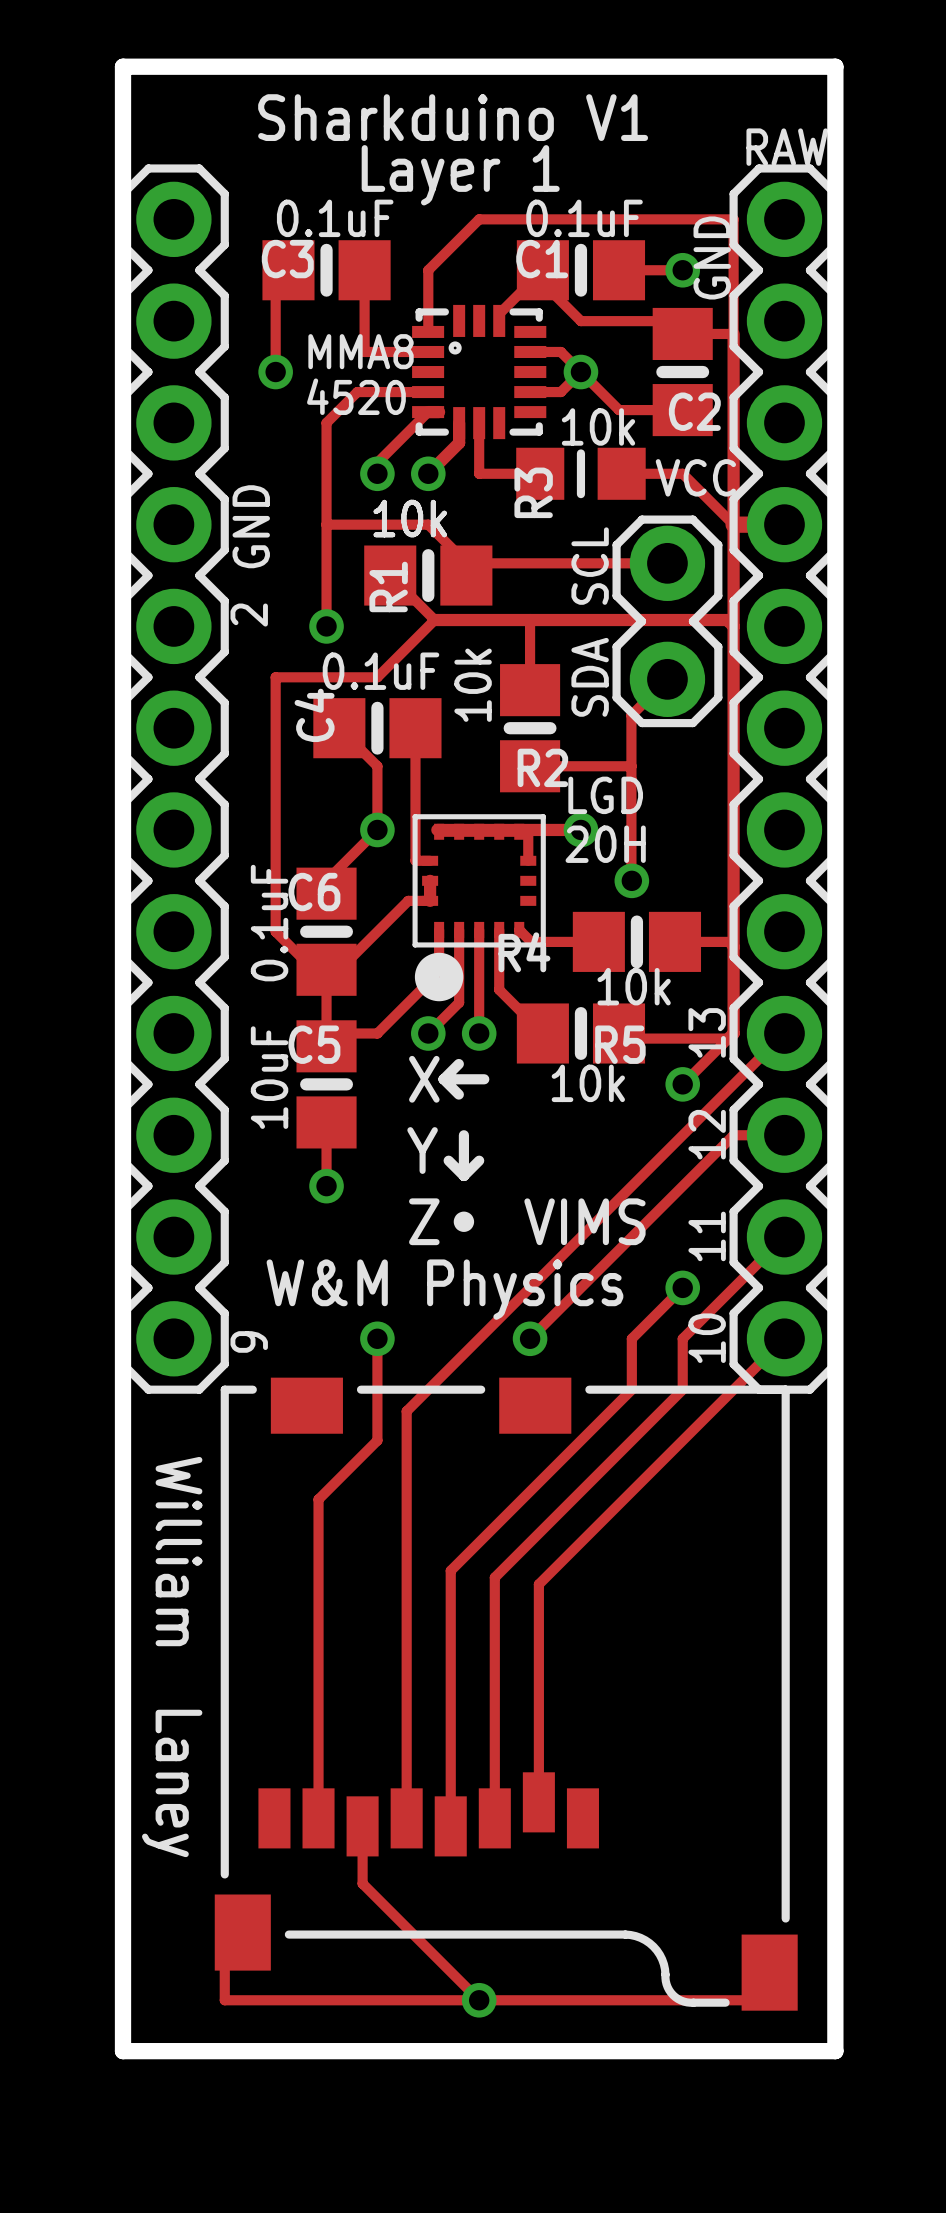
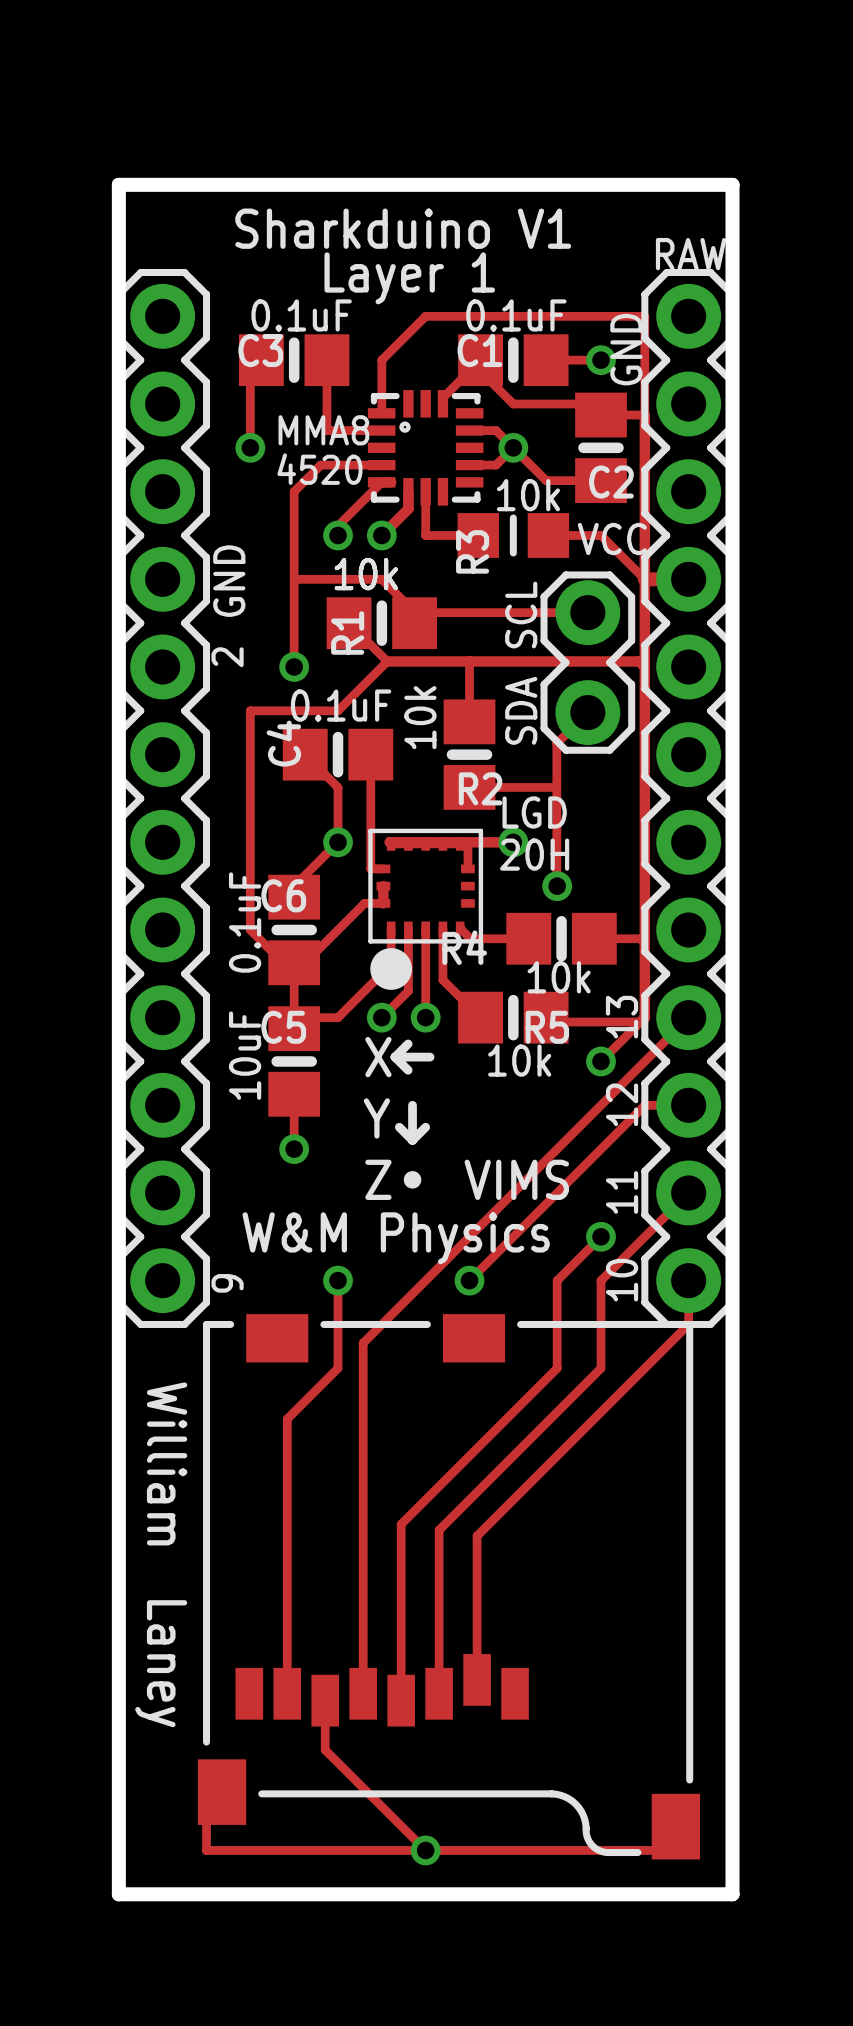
track: (784, 1338) (682, 1440) -> (601, 1324) (601, 1368)
track: none -> (688, 1280) (688, 1324) (477, 1536)
track: (631, 1389) (450, 1570) (450, 1621) -> none
track: (682, 1389) (631, 1440) -> (557, 1324) (557, 1368)
track: (494, 1577) (494, 1628) -> (439, 1486) (401, 1524)
track: (538, 1584) (538, 1635) -> (477, 1492) (439, 1530)

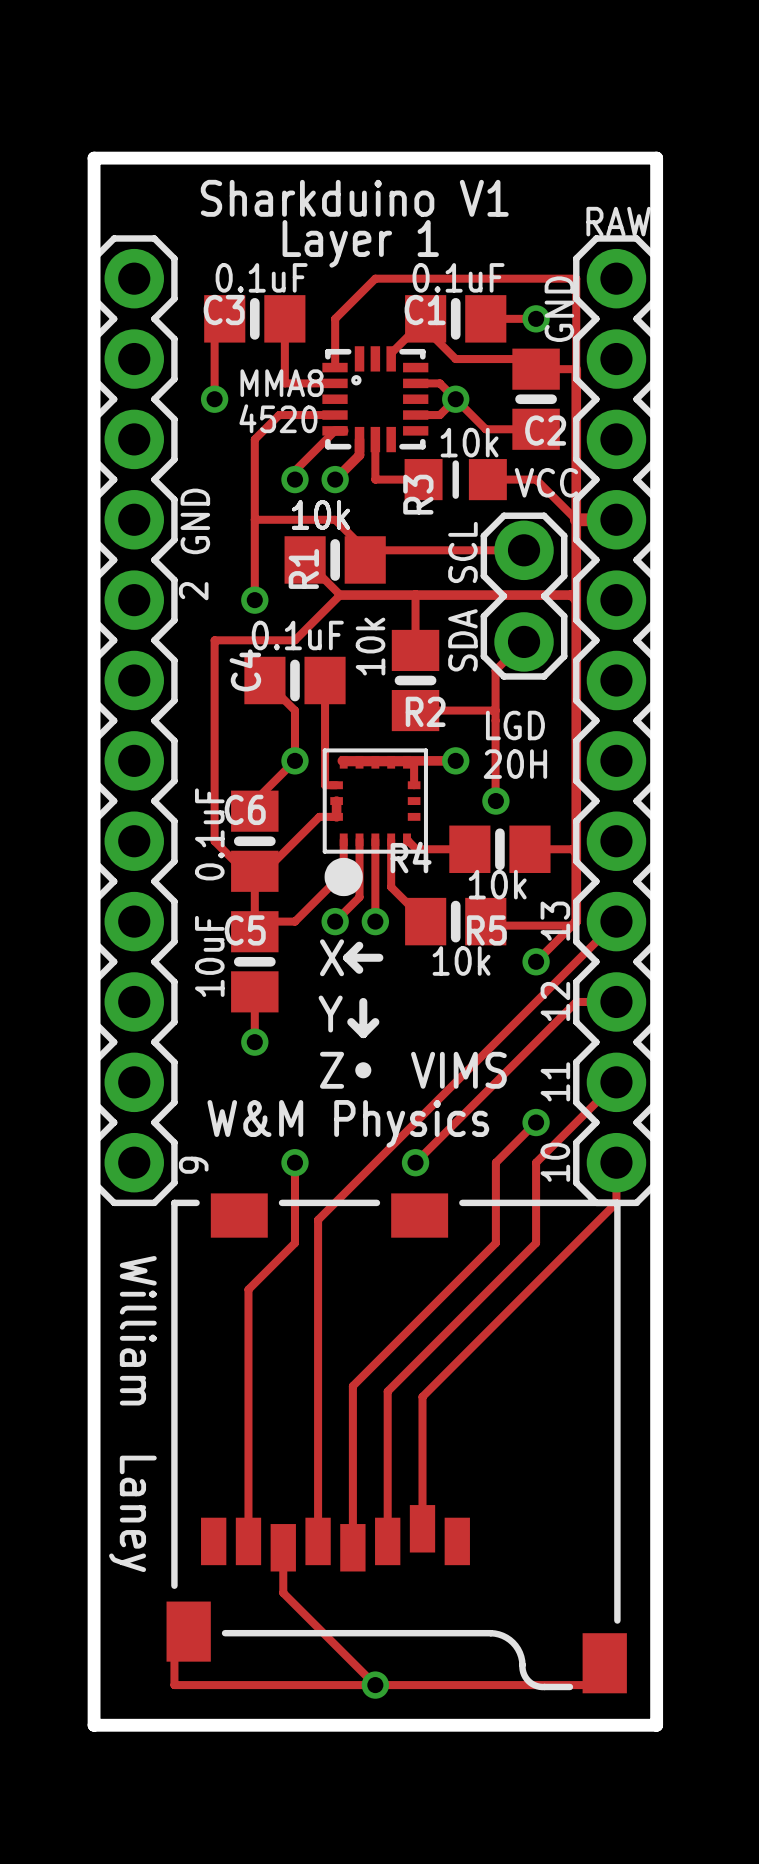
text position: LGD (534, 812) -> LGD (515, 725)
text position: 20H (534, 854) -> 20H (515, 764)

